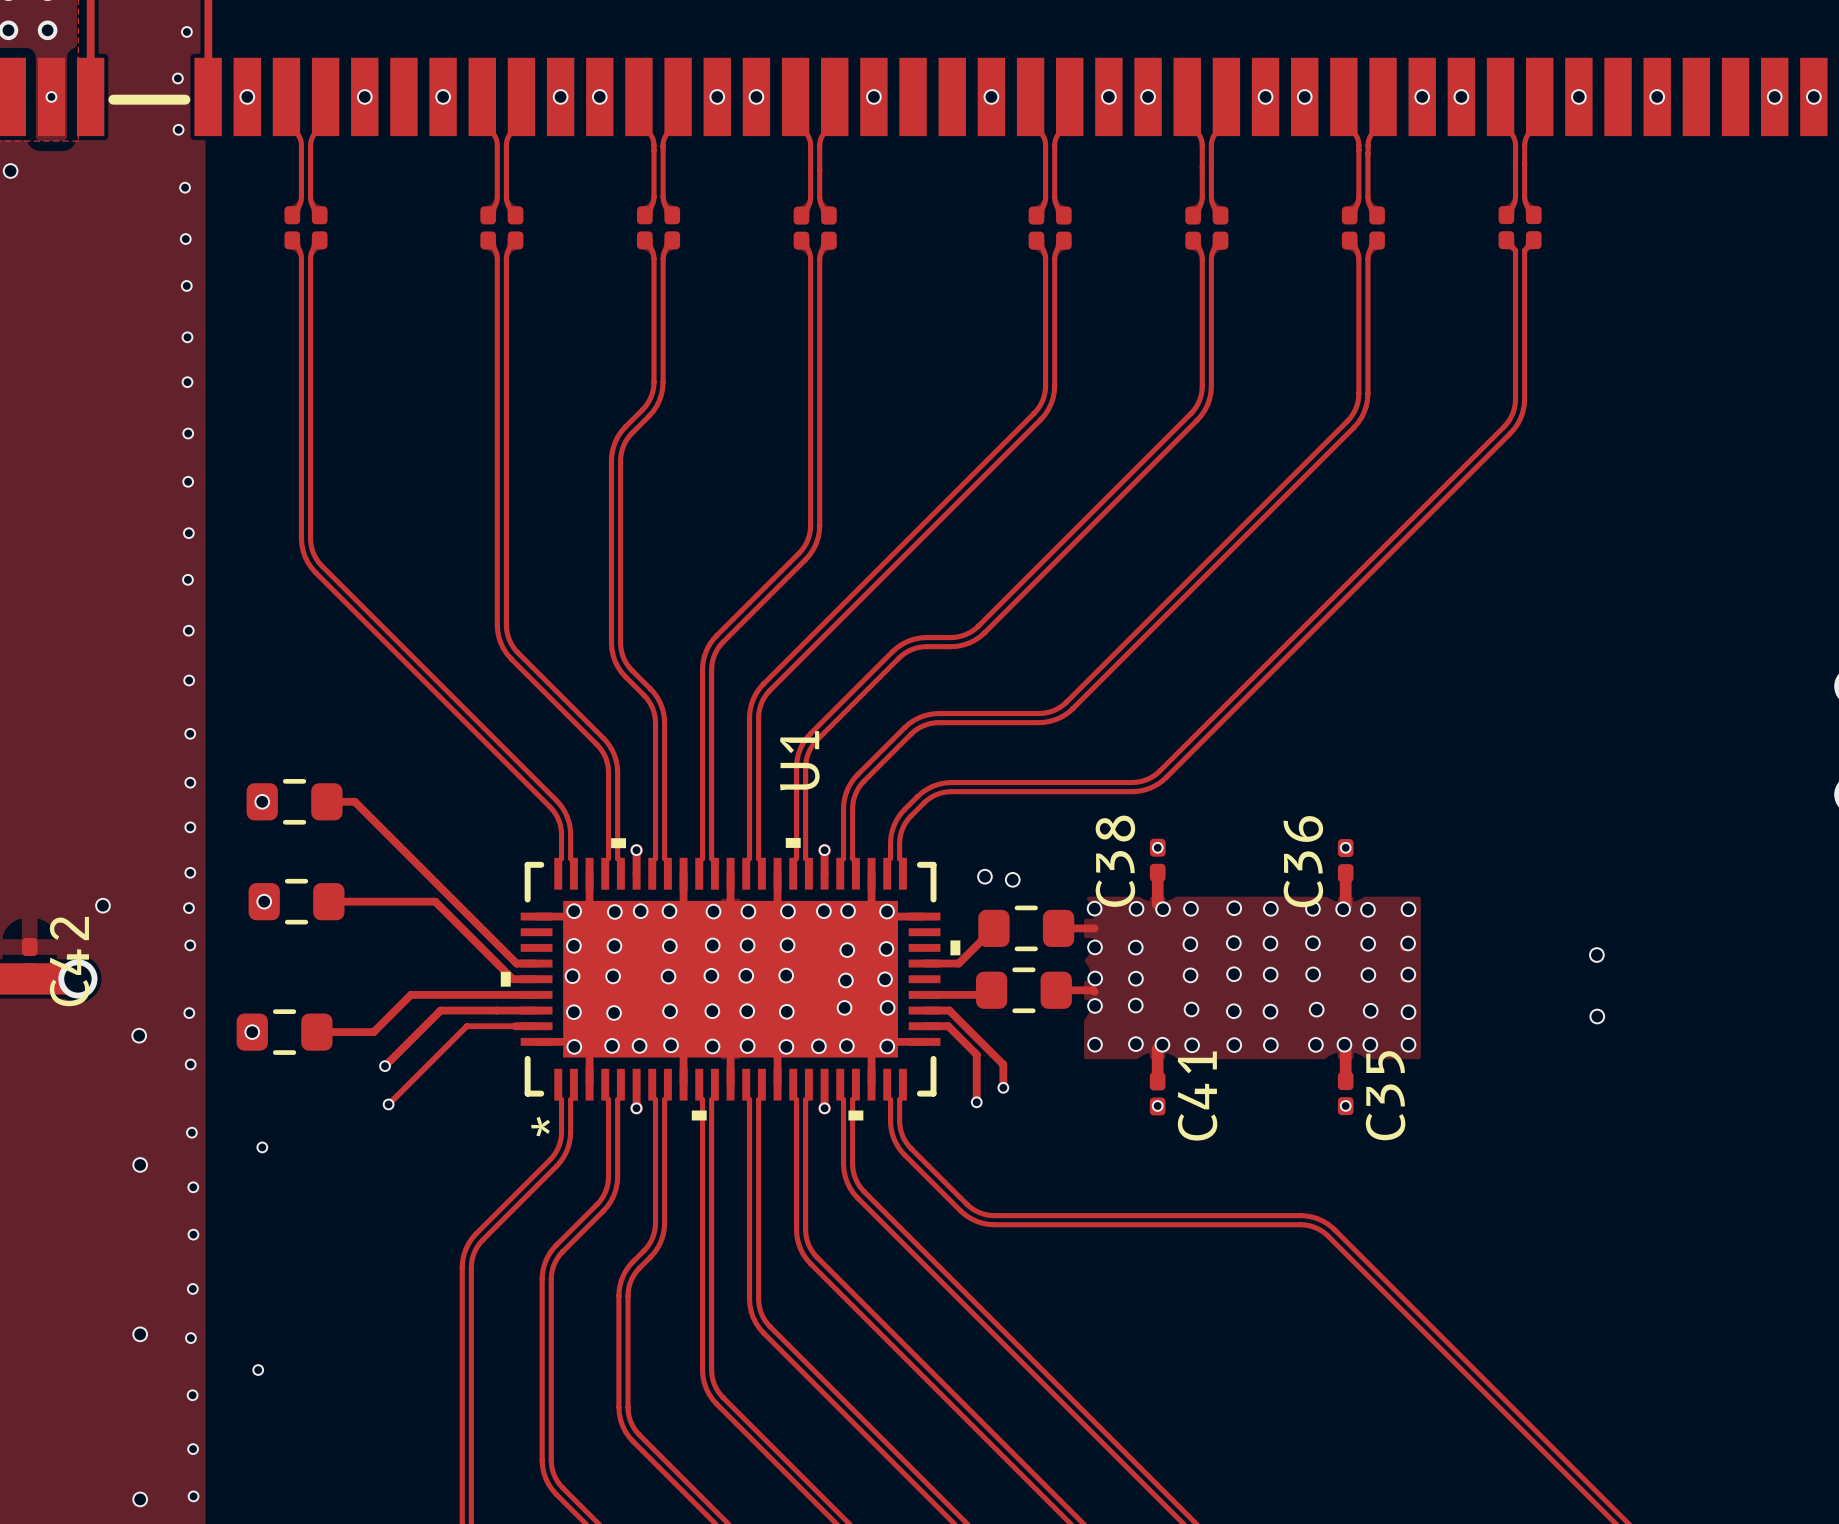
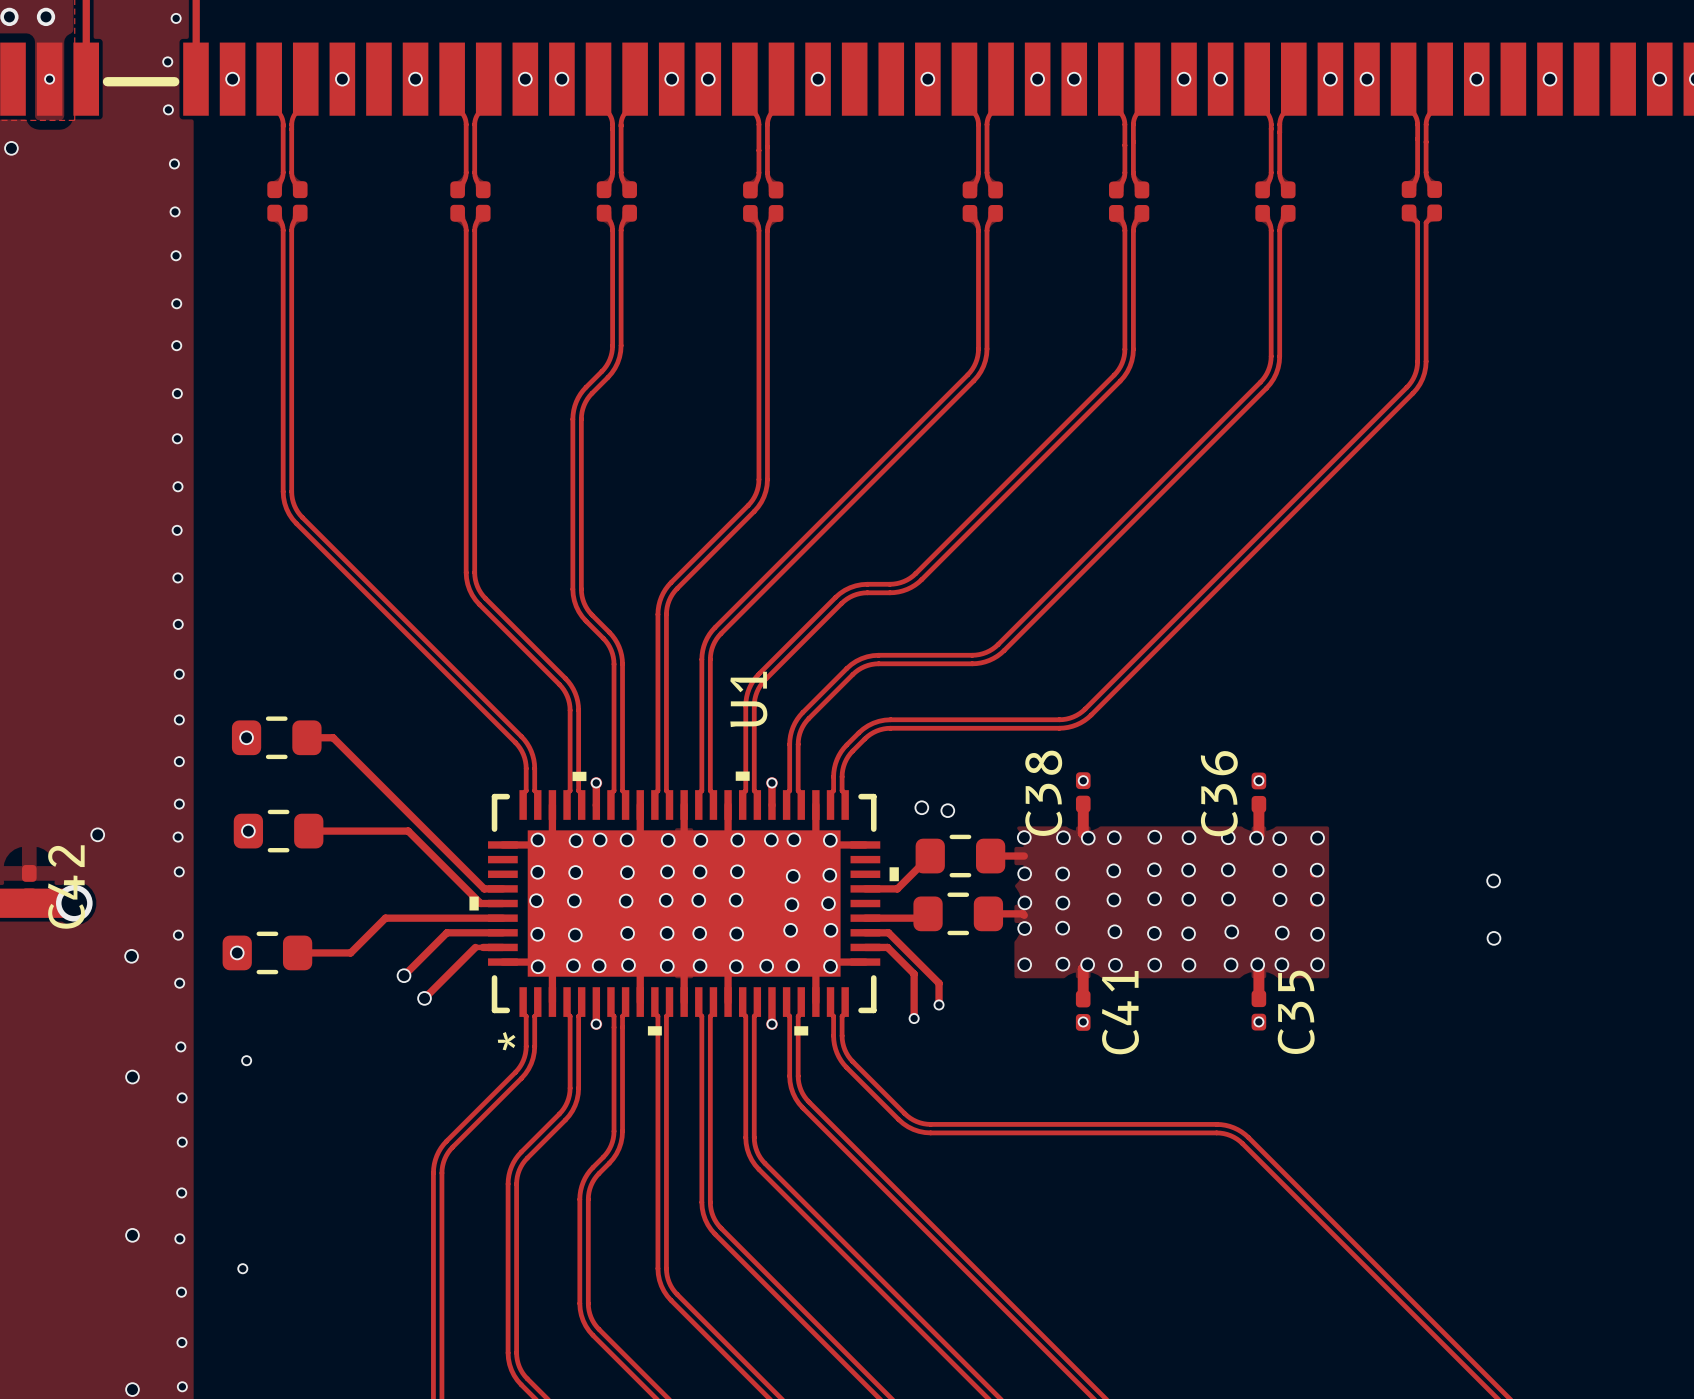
track: (476, 1010) (440, 1010) (385, 1066) -> (446, 932) (404, 975)
track: (507, 1026) (466, 1026) (388, 1104) -> (475, 947) (424, 998)
via: none -> (404, 975)
via: (385, 1066) -> none
via: none -> (424, 998)
via: (388, 1104) -> none

